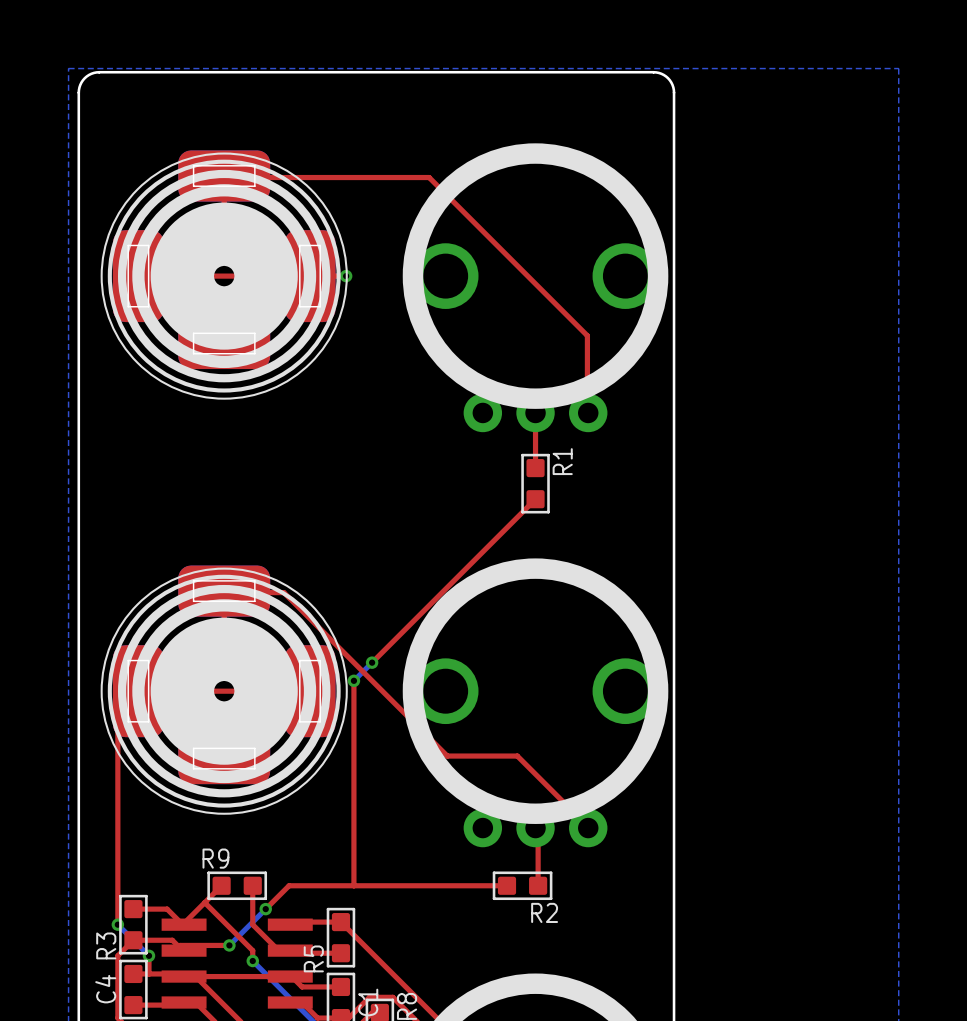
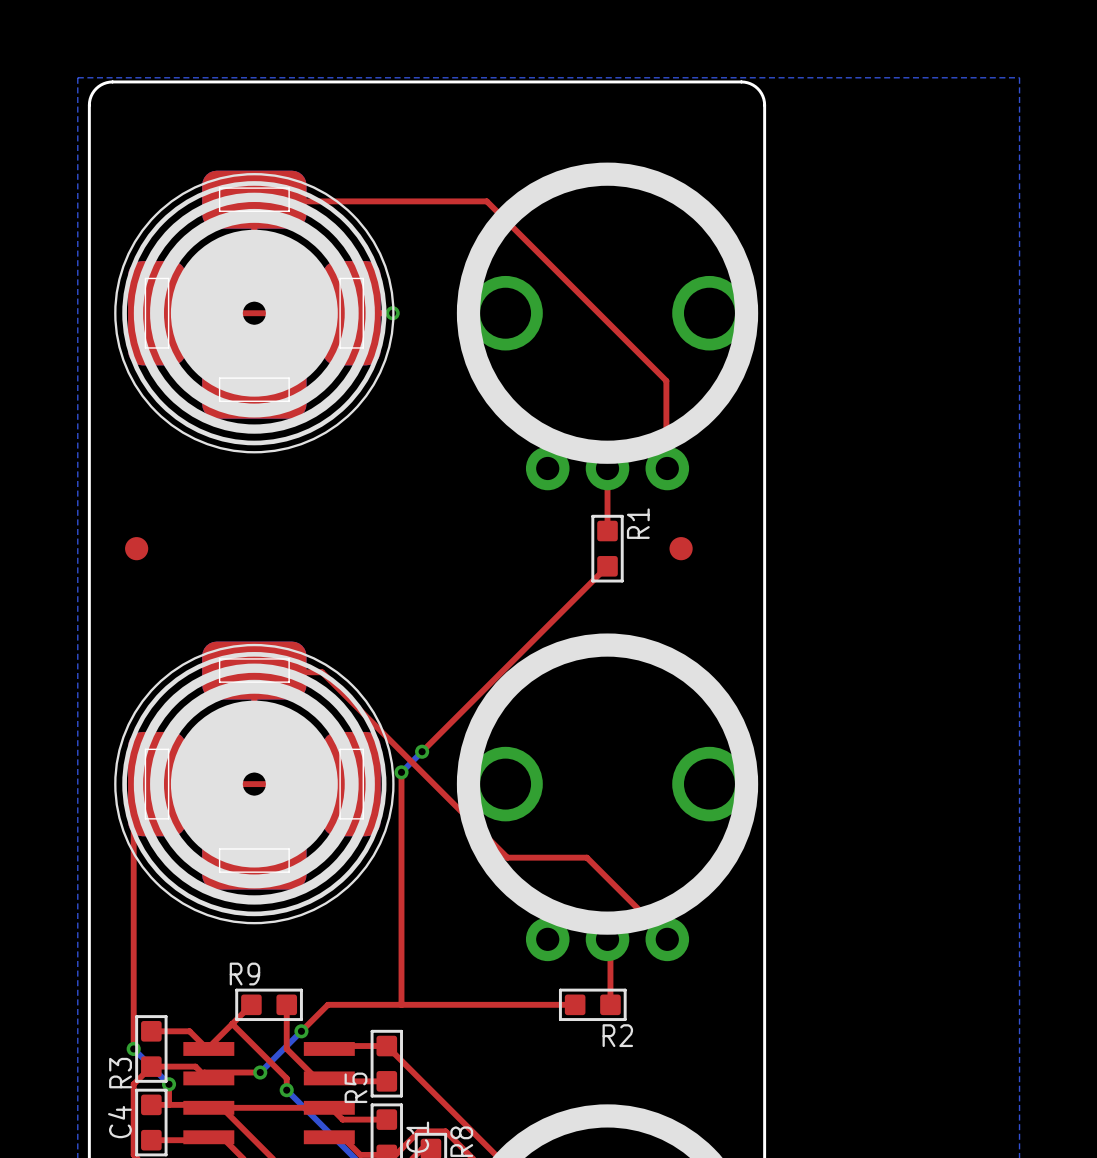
part: none -> (136, 548)
part: none -> (681, 548)

